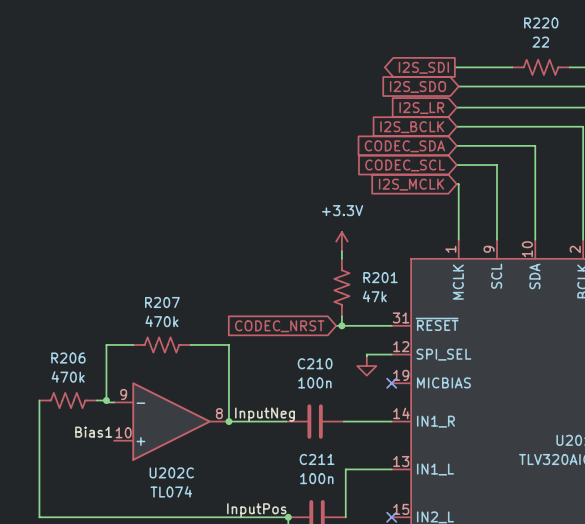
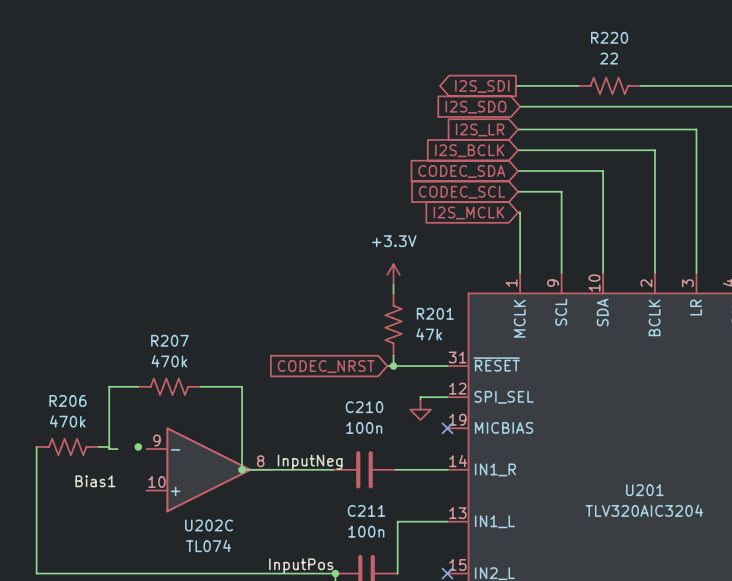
wire: (133, 344) (106, 344) (106, 402) (114, 402) -> (138, 386) (109, 386) (109, 449) (117, 449)
R207 position: (161, 344) -> (169, 386)
wire: (202, 344) (228, 344) (228, 421) -> (242, 386) (242, 469) (271, 469)
wire: (39, 400) (39, 517) -> (36, 446) (36, 573) (65, 573)
R206 position: (68, 400) -> (67, 446)
wire: (96, 400) (106, 400) -> (98, 446) (109, 446)
junction position: (228, 421) -> (242, 469)
label position: Bias1 (93, 432) -> Bias1 (95, 481)

